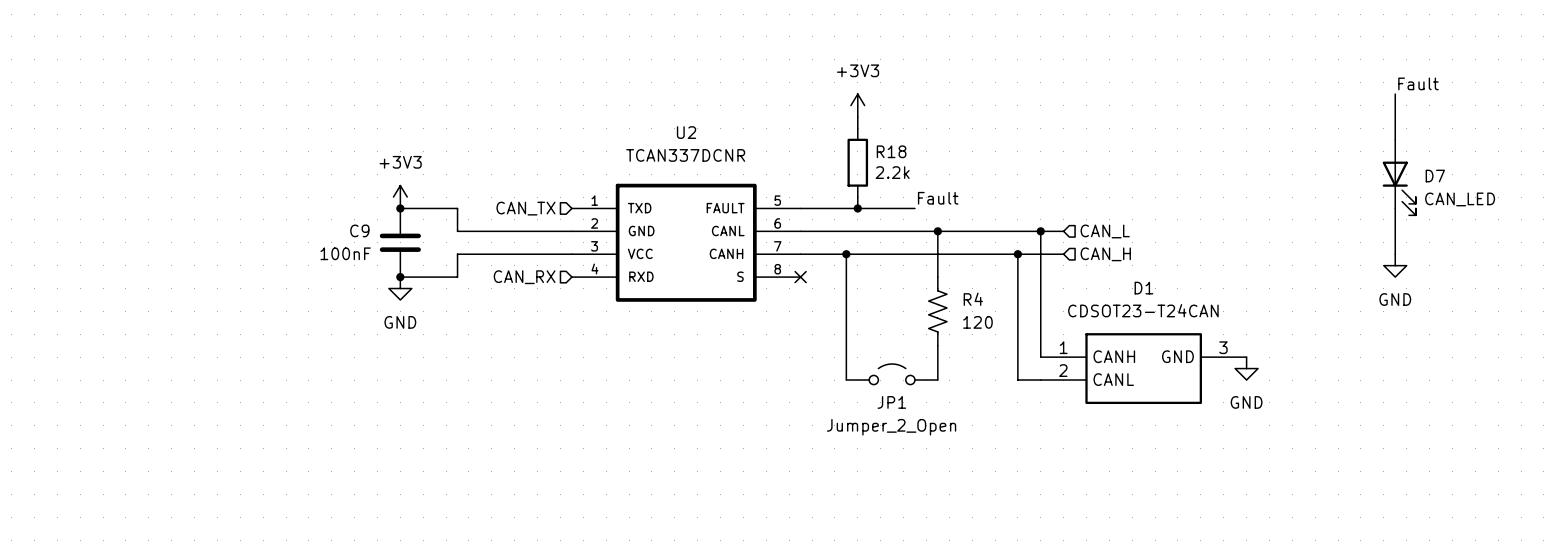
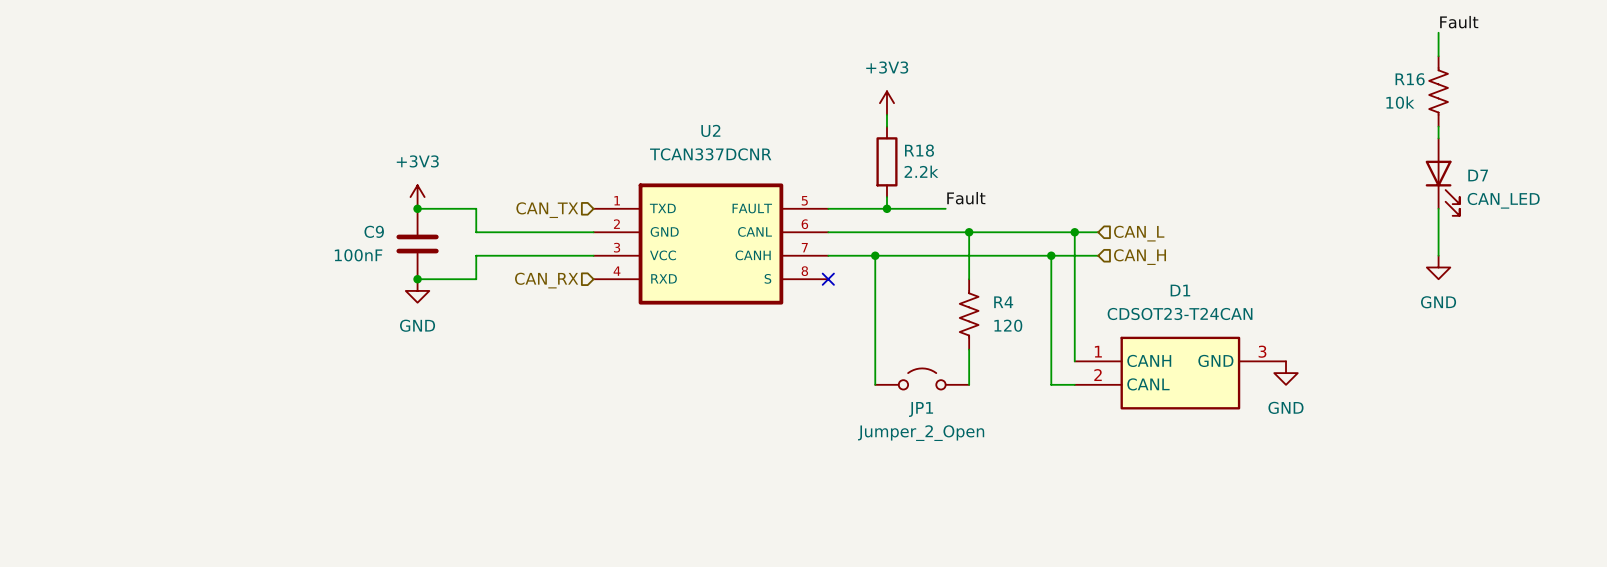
wire: none -> (1438, 32) (1438, 56)
label position: Fault (1418, 83) -> Fault (1459, 22)
R16: none -> 10k (1438, 91)

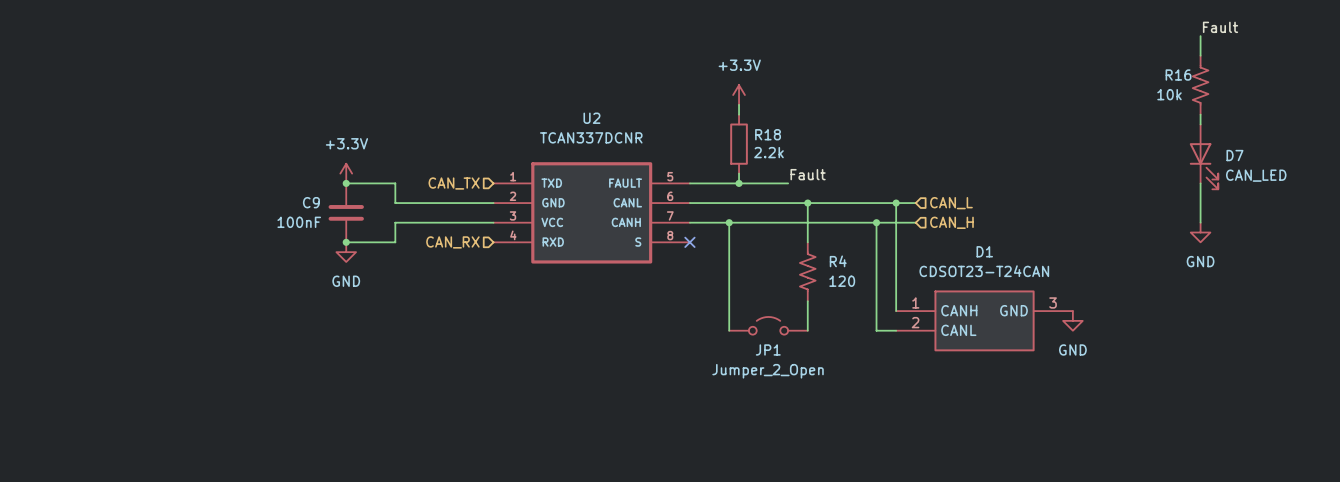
power symbol: +3V3 (886, 103) -> +3.3V (739, 95)
power symbol: +3V3 (417, 197) -> +3.3V (346, 173)

